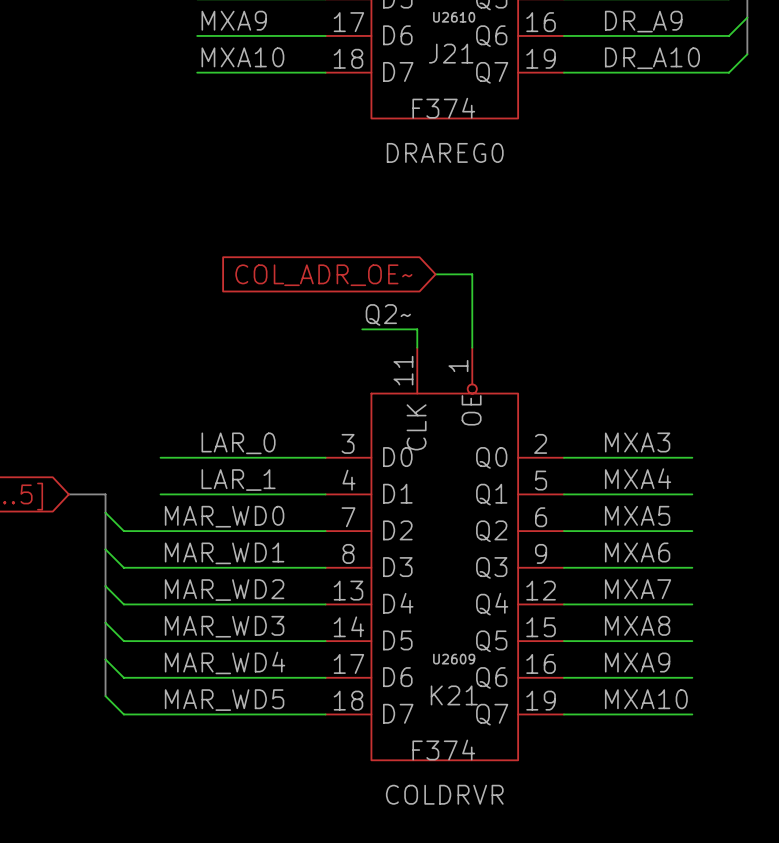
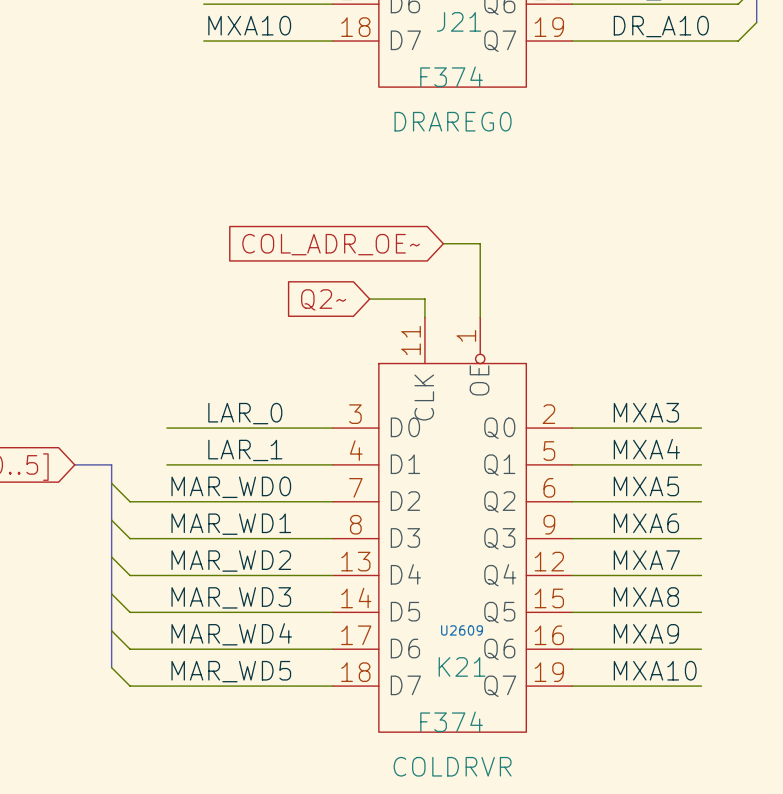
label: Q2~ (388, 314) -> none
global label: none -> Q2~ (323, 299)

